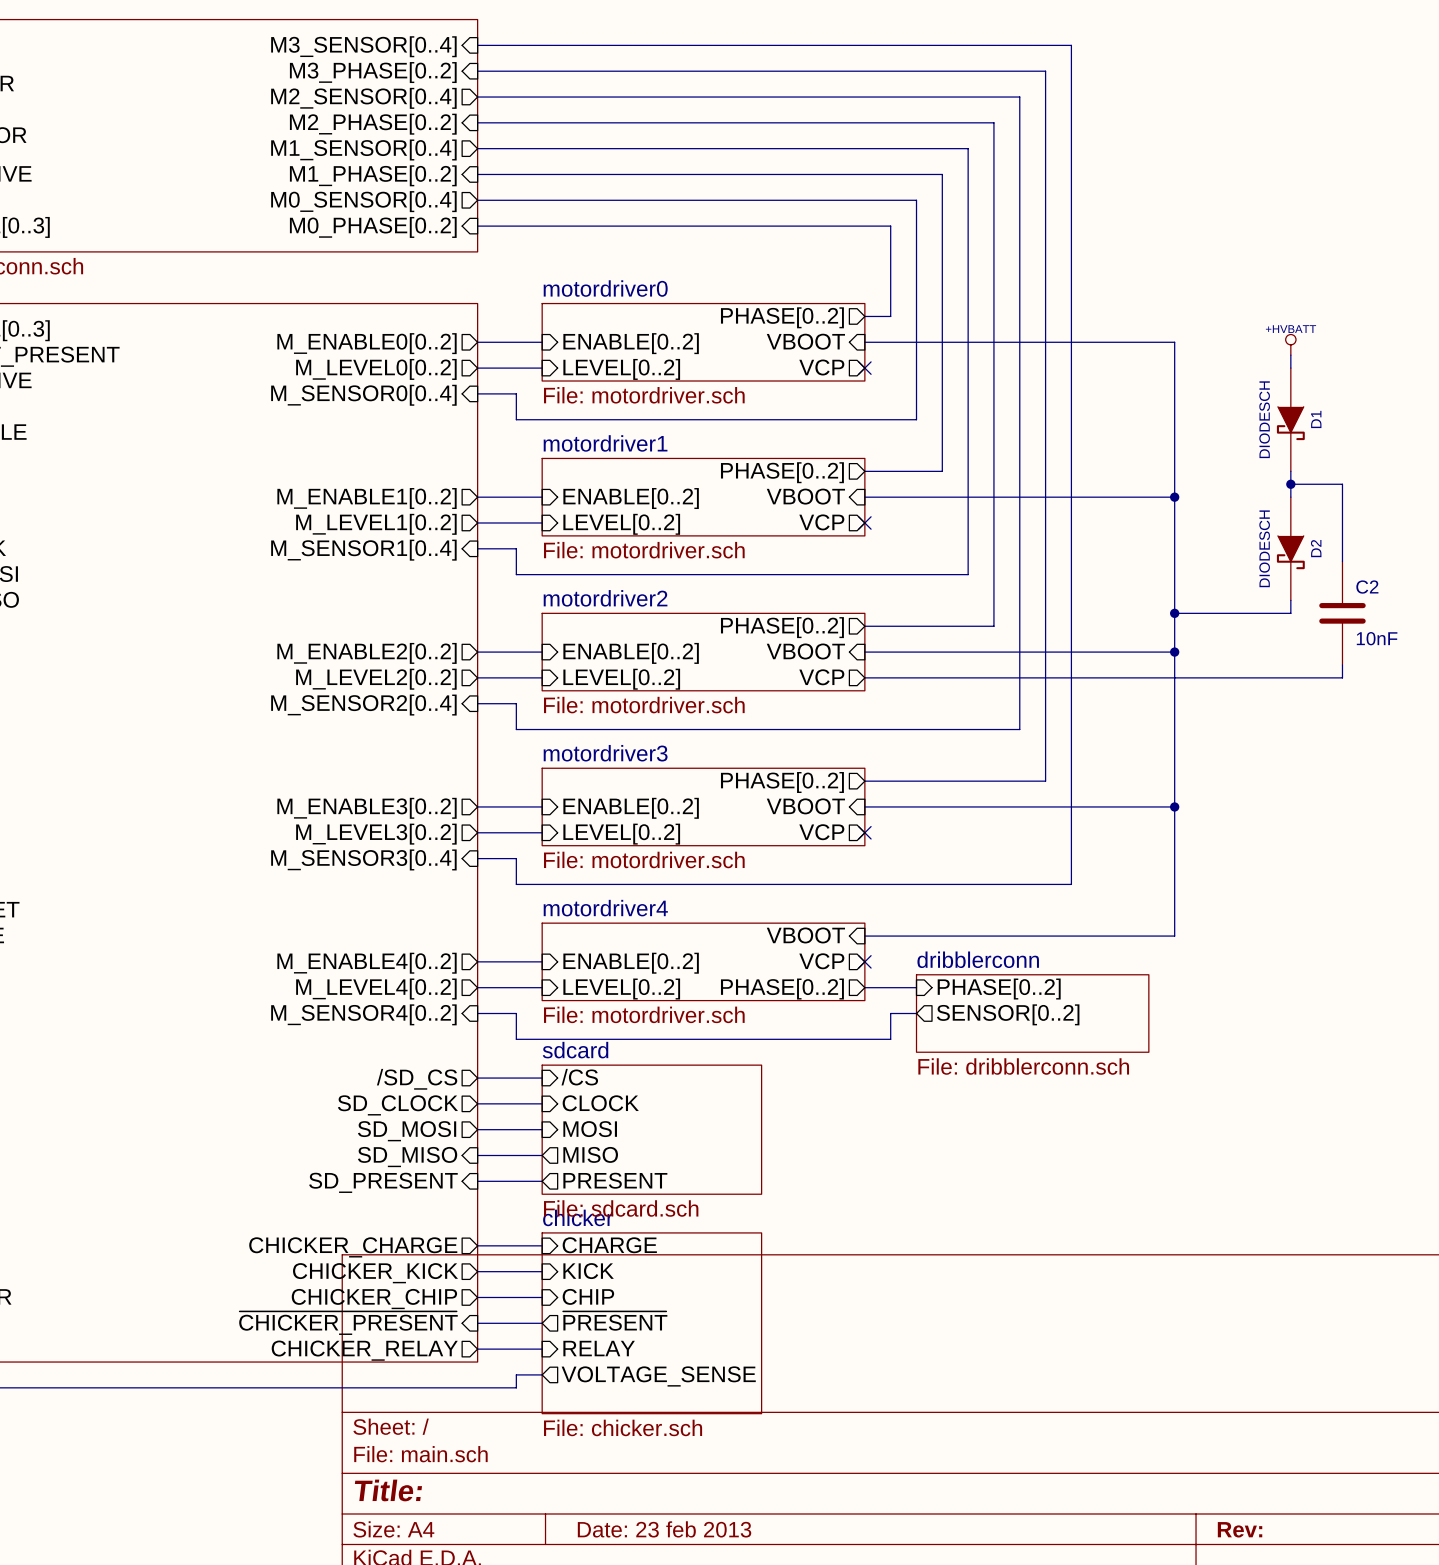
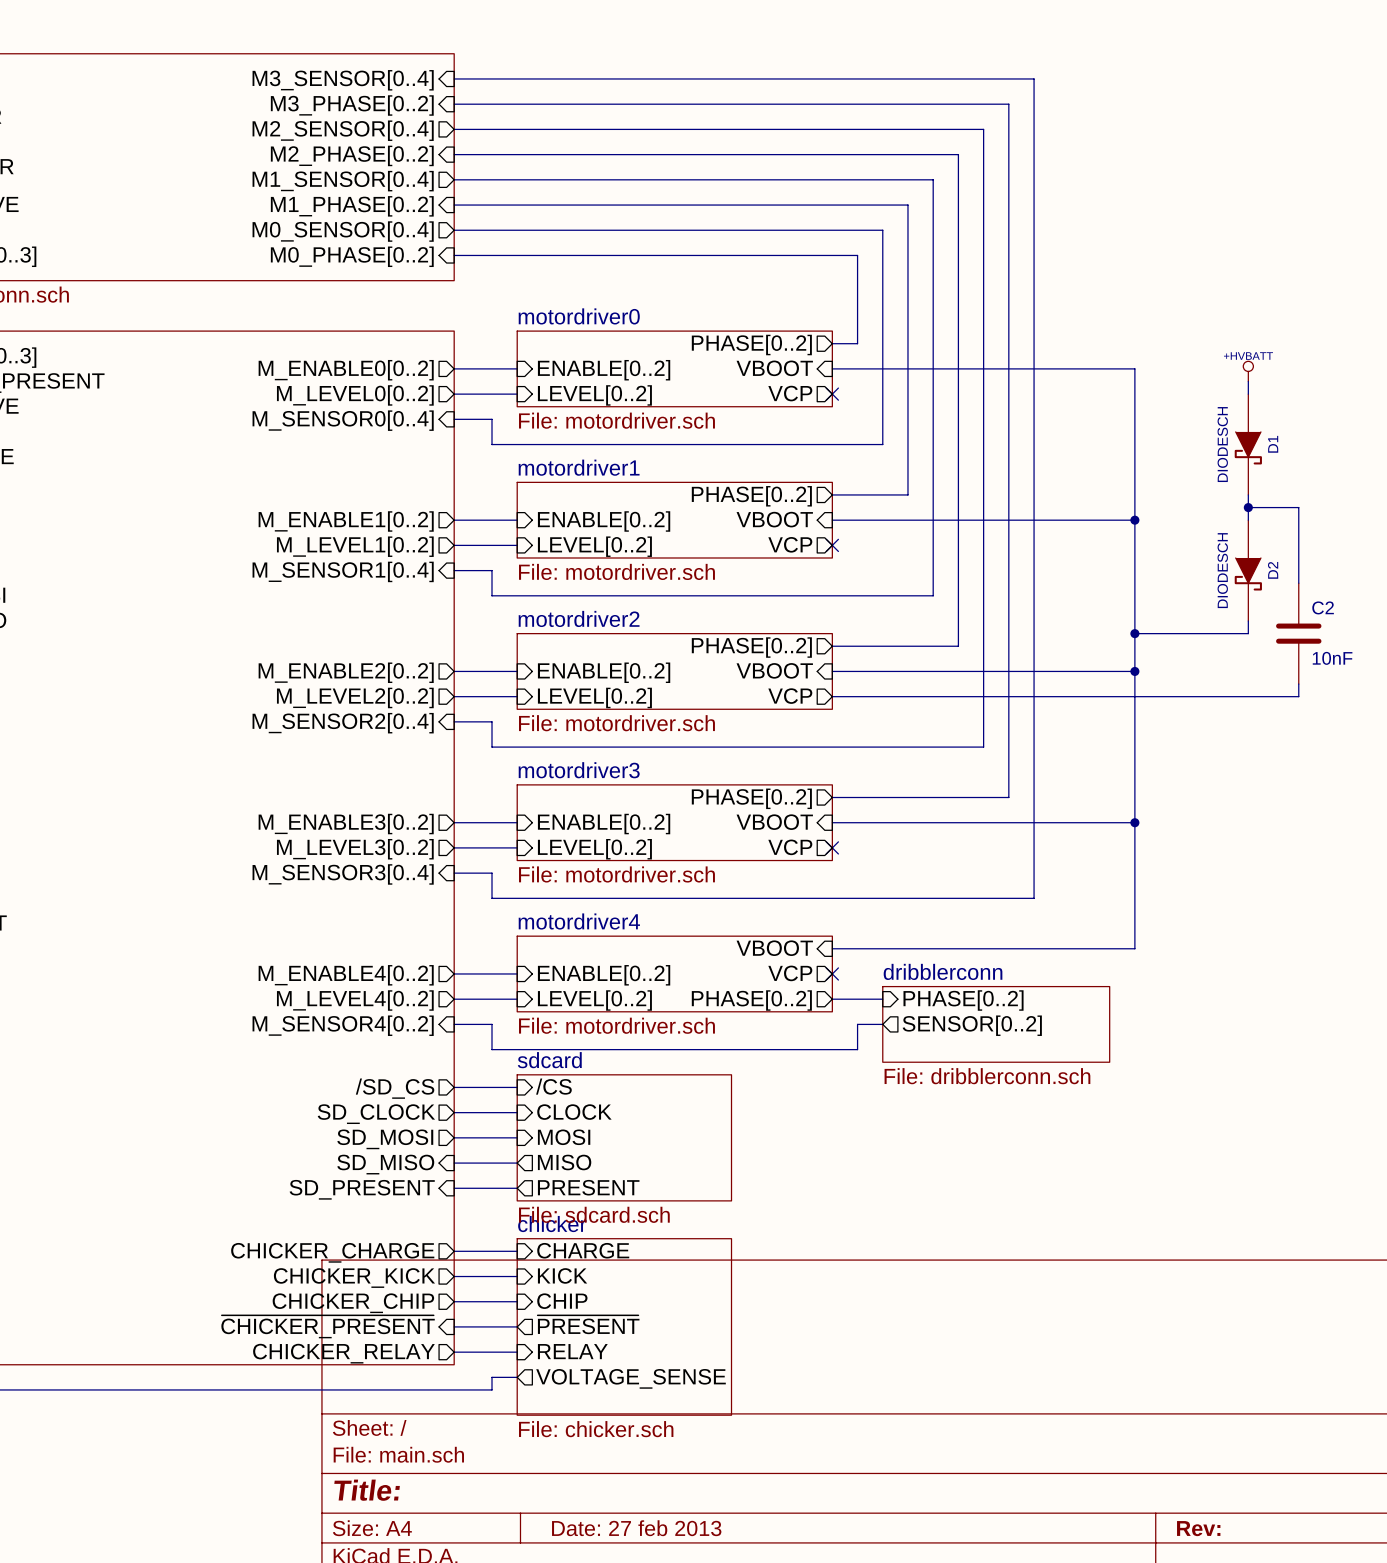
title block: Date: 23 feb 2013 (664, 1529) -> Date: 27 feb 2013 (636, 1528)

